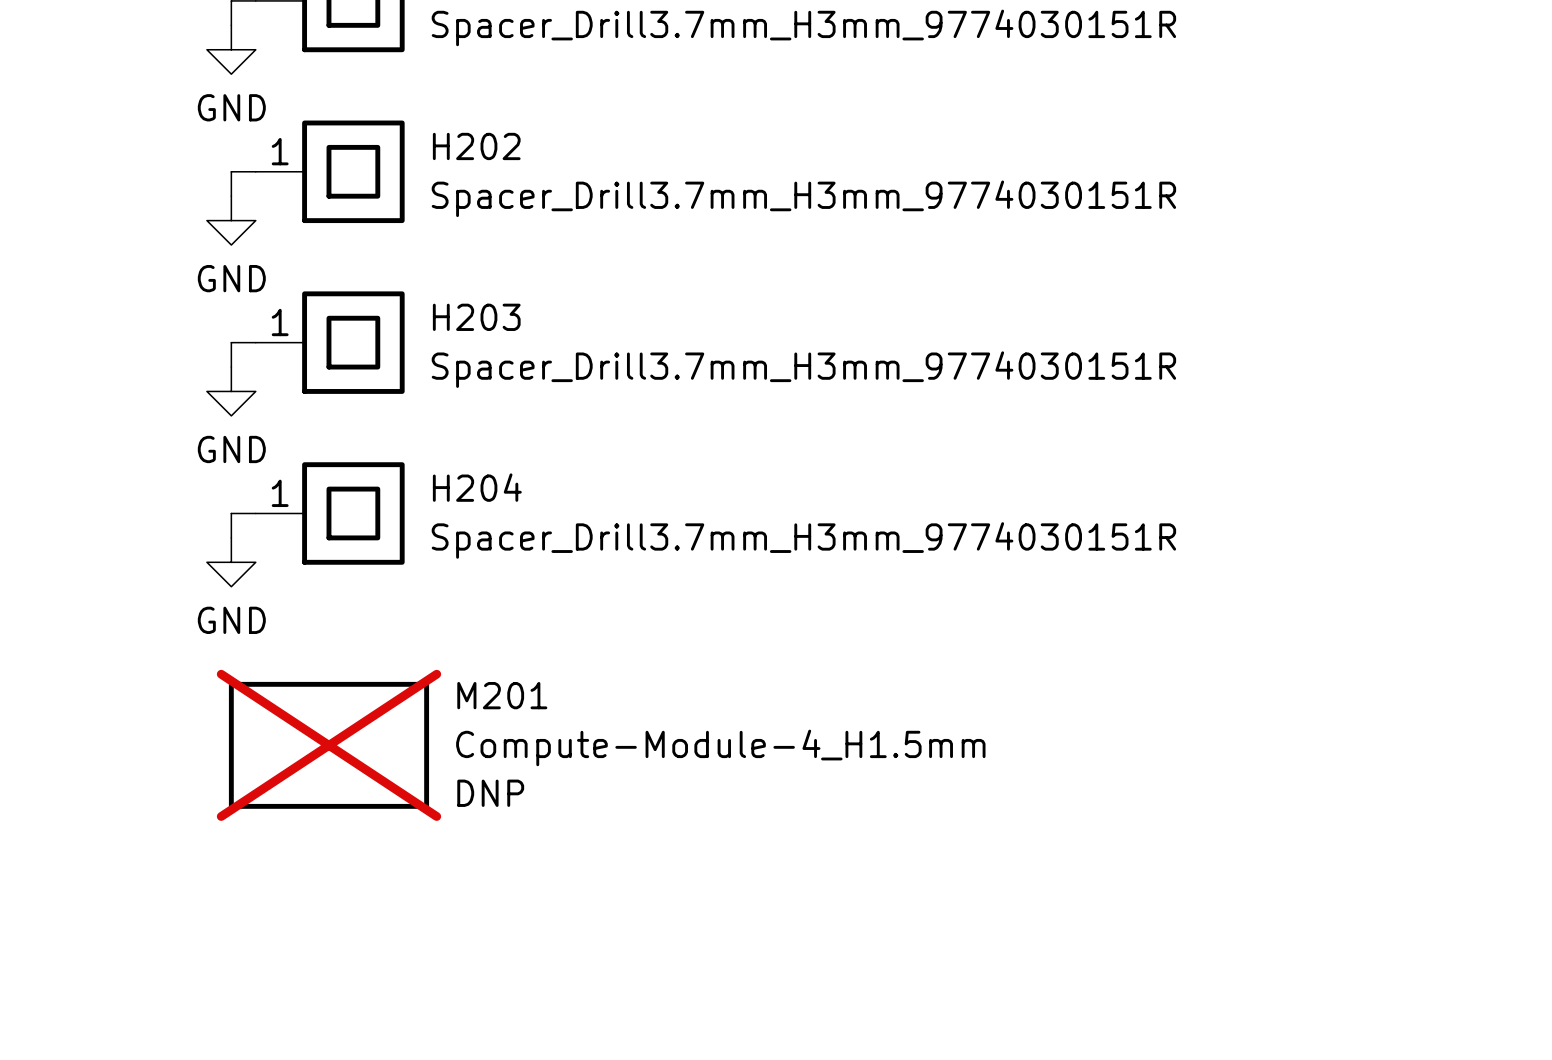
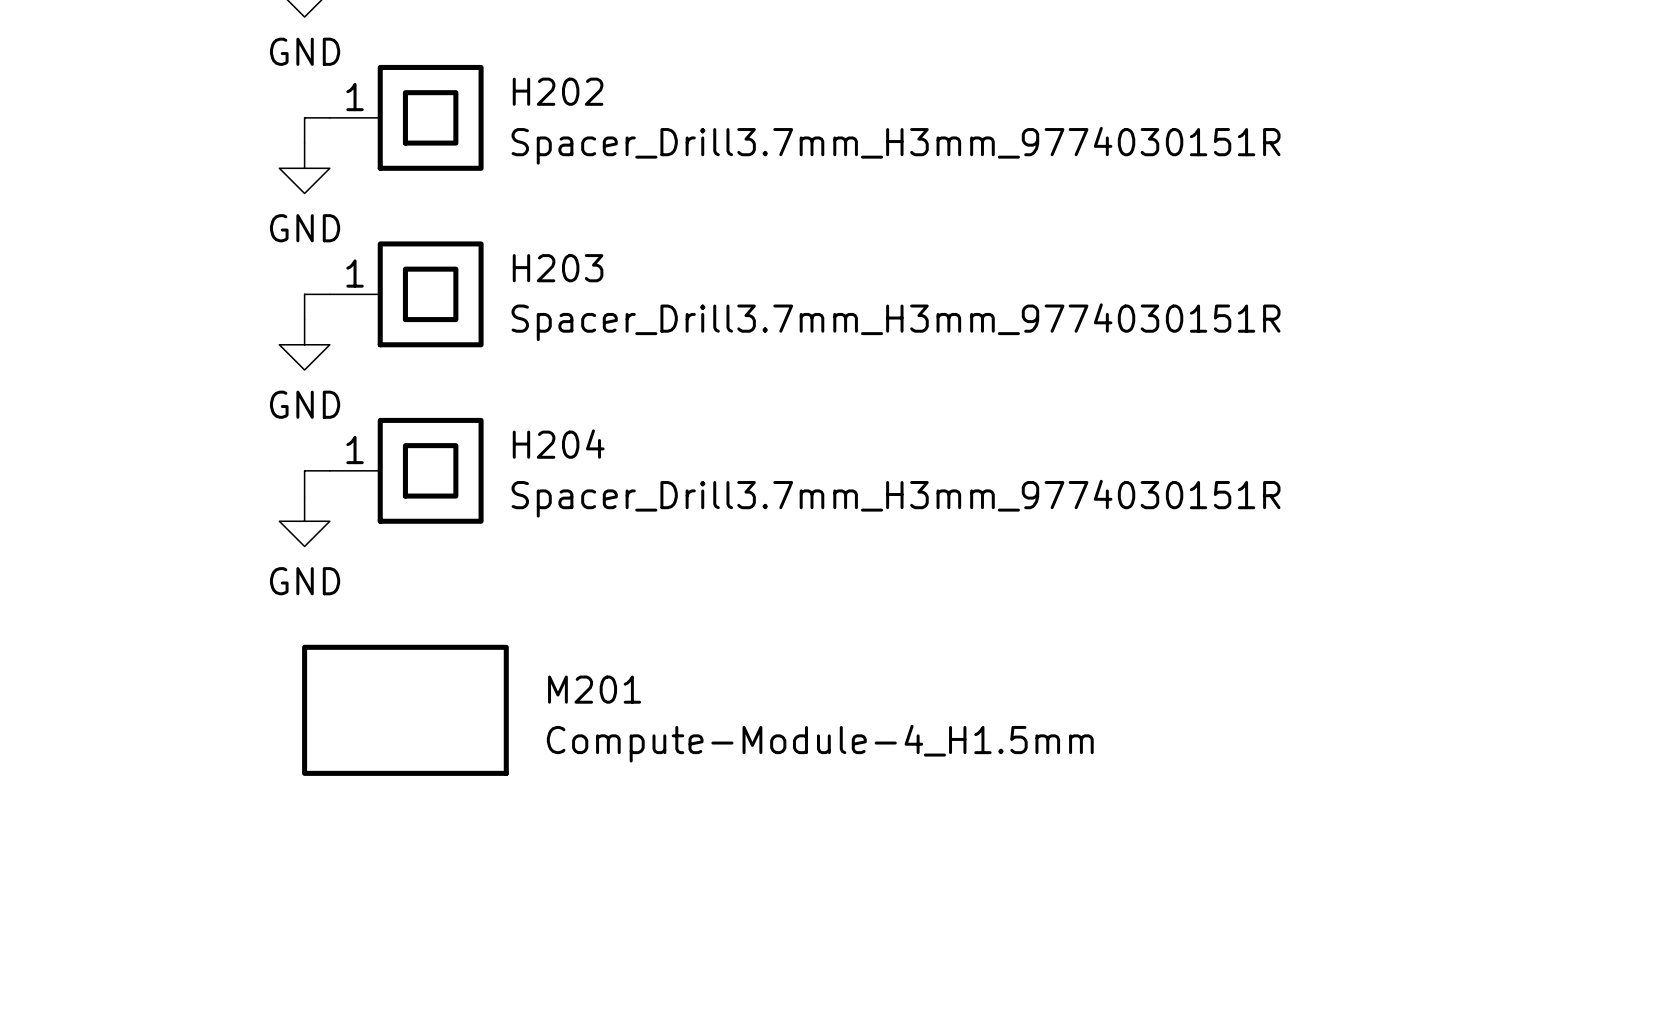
M201 name position: M201 (502, 695) -> M201 (594, 689)
M201 do-not-place cross: (328, 745) -> none
M201 value position: Compute-Module-4_H1.5mm (720, 747) -> Compute-Module-4_H1.5mm (820, 743)
M201 text: DNP (490, 793) -> none

